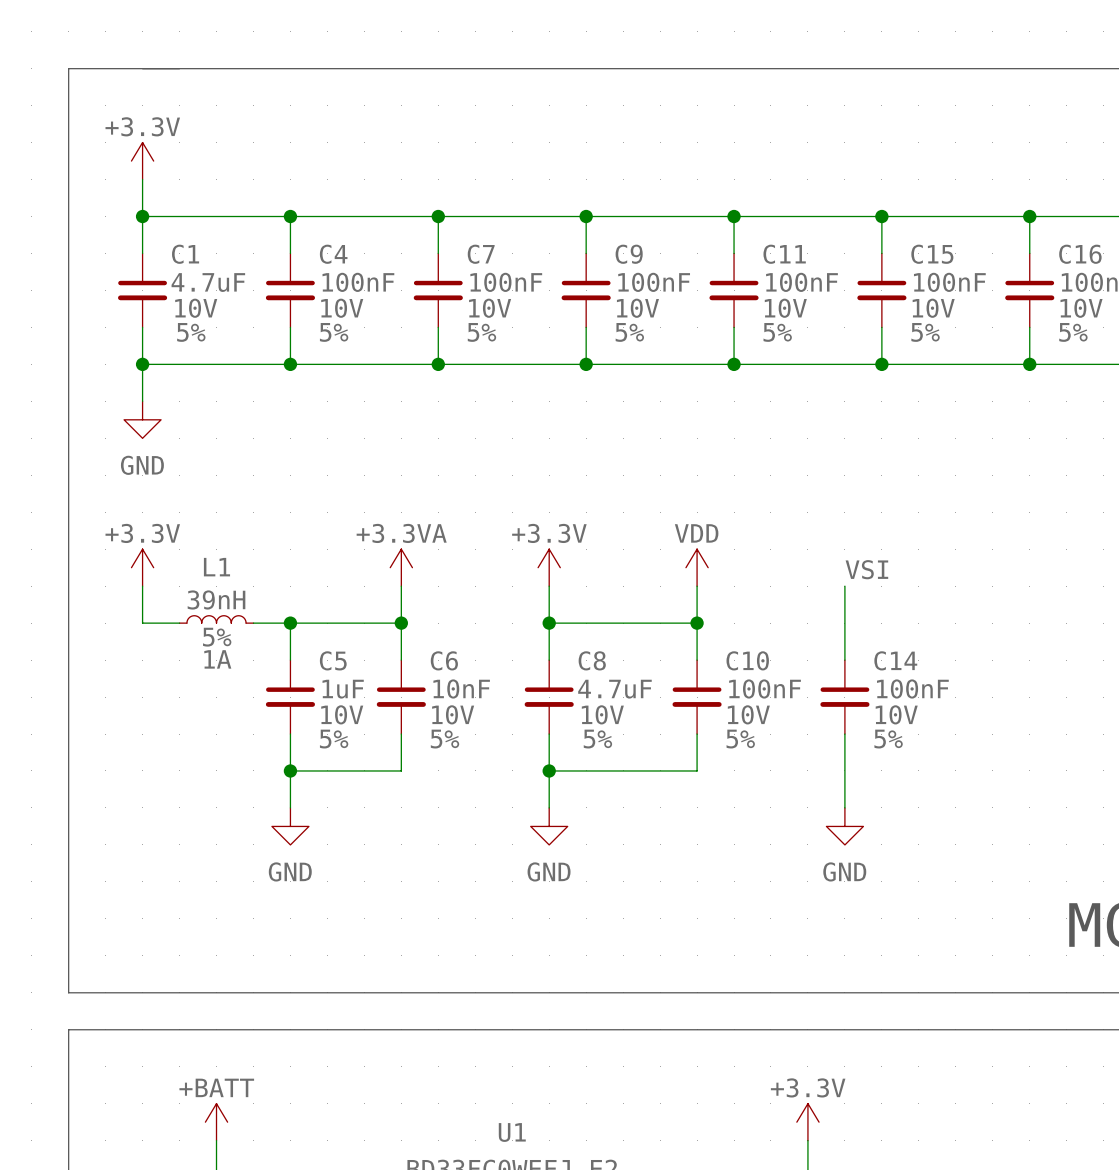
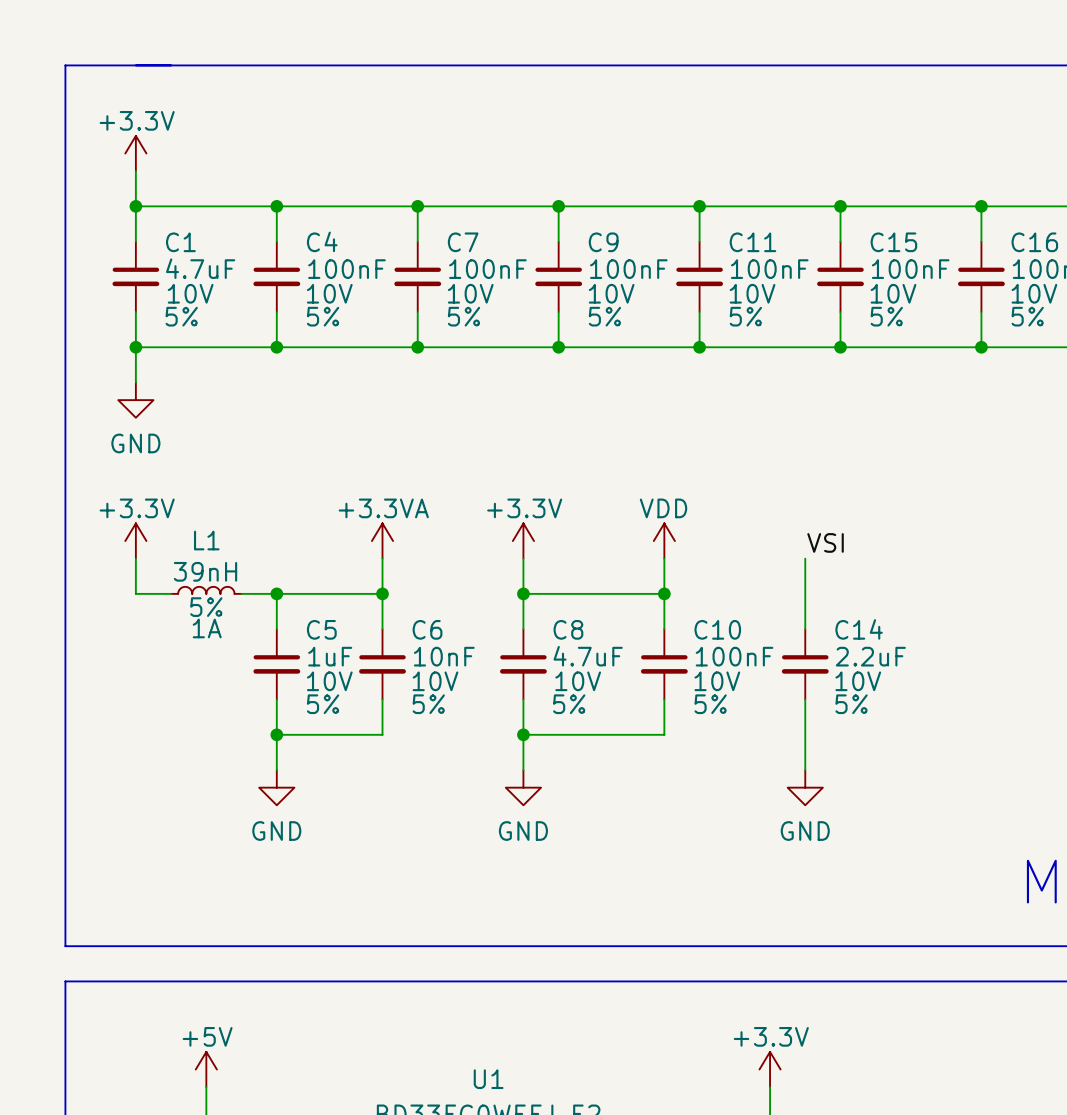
C14 value: 100nF (912, 688) -> 2.2uF (870, 656)
power symbol: +BATT (216, 1122) -> +5V (206, 1069)

